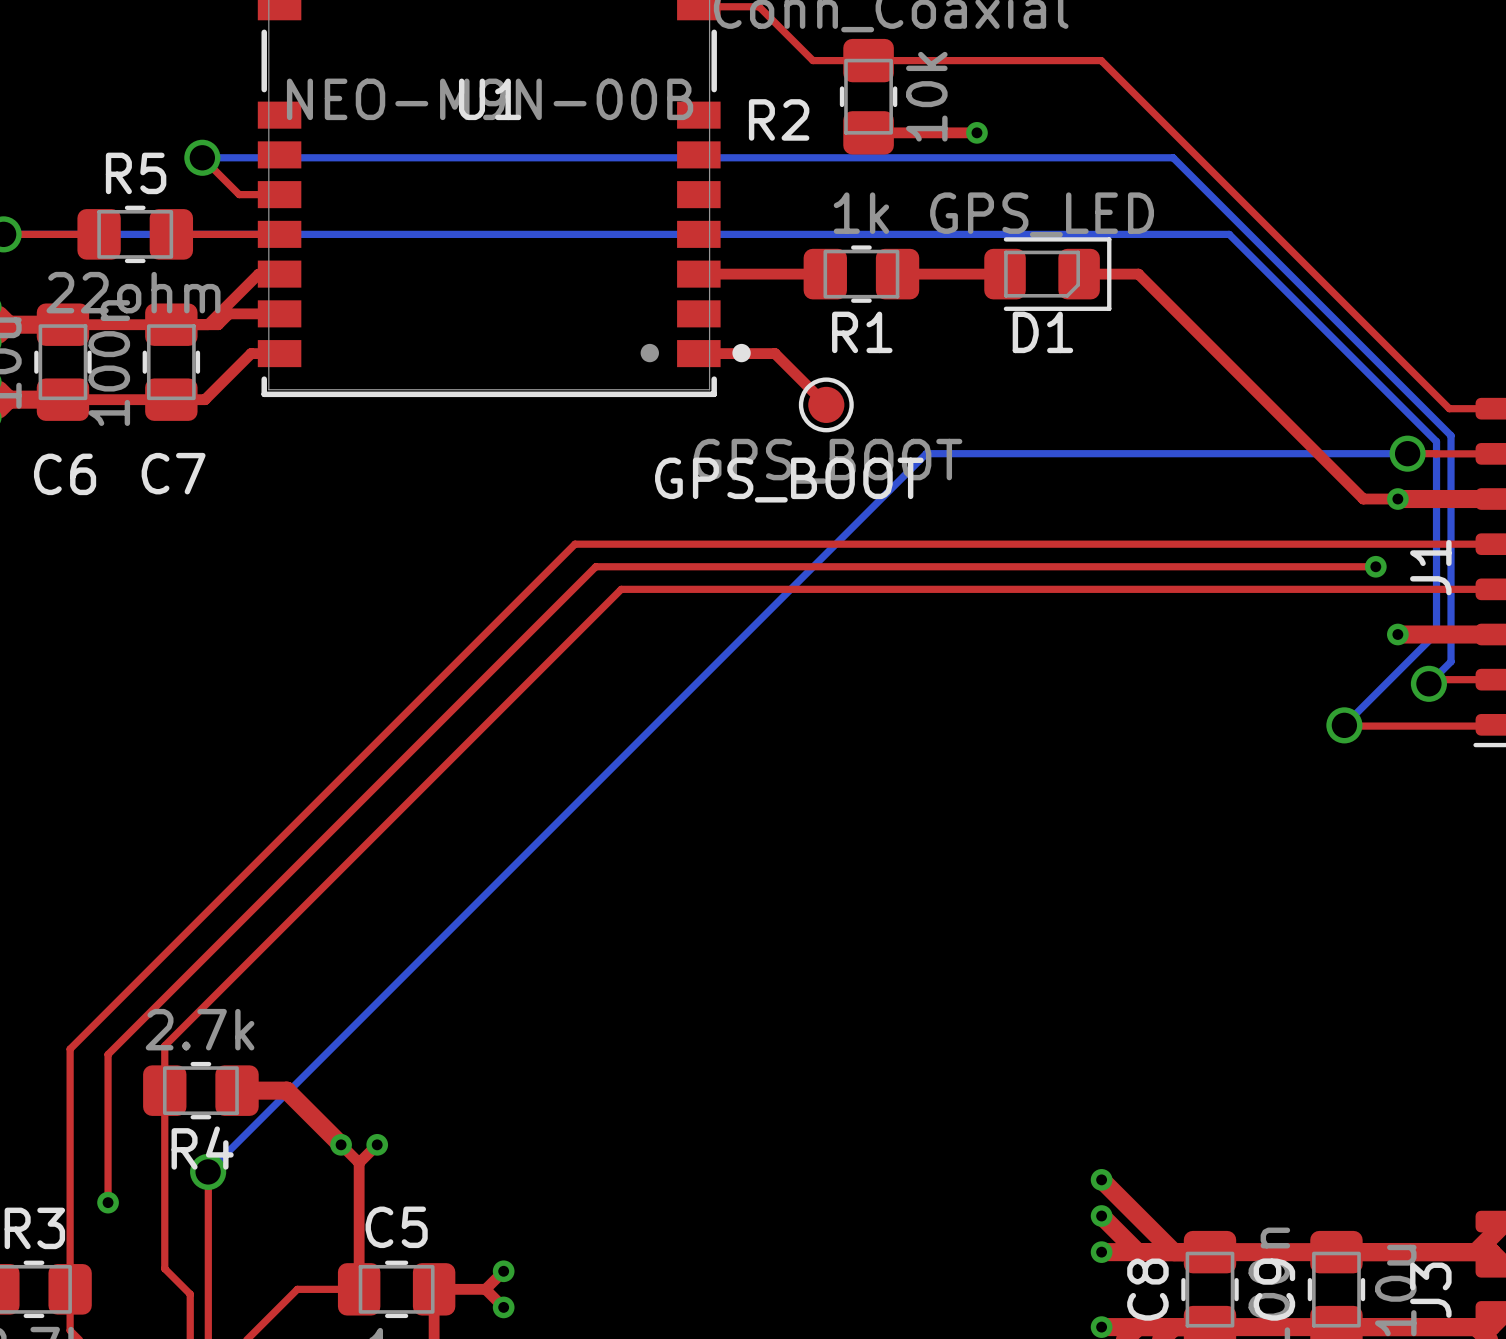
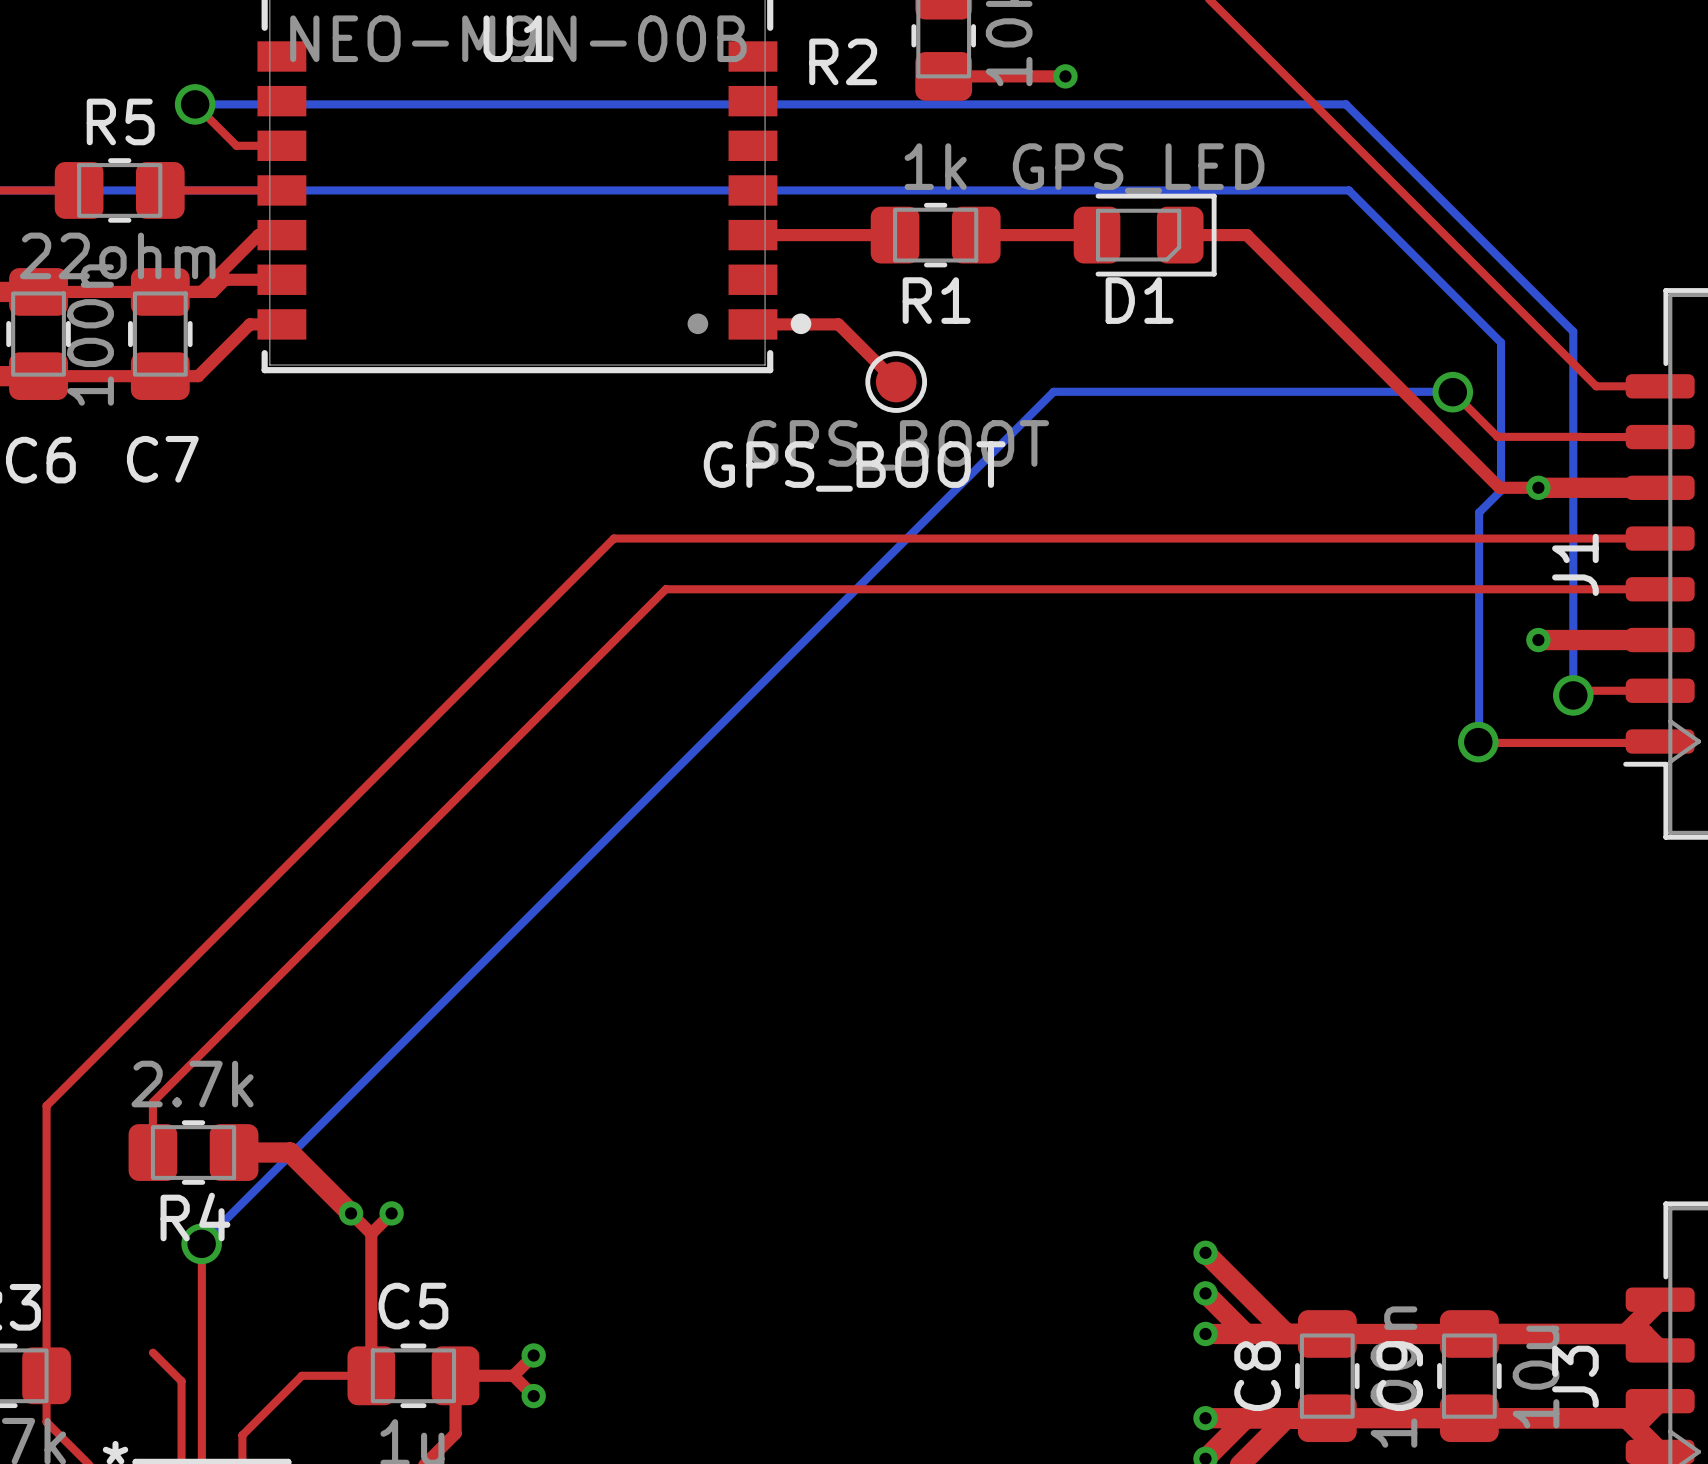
bottom track: (1173, 157) (1451, 435) (1451, 661) (1428, 683) -> (1285, 104) (1345, 104) (1573, 331) (1573, 695)
bottom track: (1364, 369) (1436, 441) (1436, 633) (1345, 724) -> (1501, 342) (1501, 490) (1479, 512) (1479, 741)
top track: none -> (1452, 392) (1497, 436) (1549, 436)
bottom track: (926, 453) (1407, 453) -> (1008, 436) (1053, 391) (1452, 391)
via position: (1407, 453) -> (1452, 392)
top track: (1375, 566) (595, 566) (108, 1054) (108, 1202) -> none
via: (1375, 566) -> none
top track: (164, 1090) (164, 1268) -> none
via: (108, 1202) -> none

